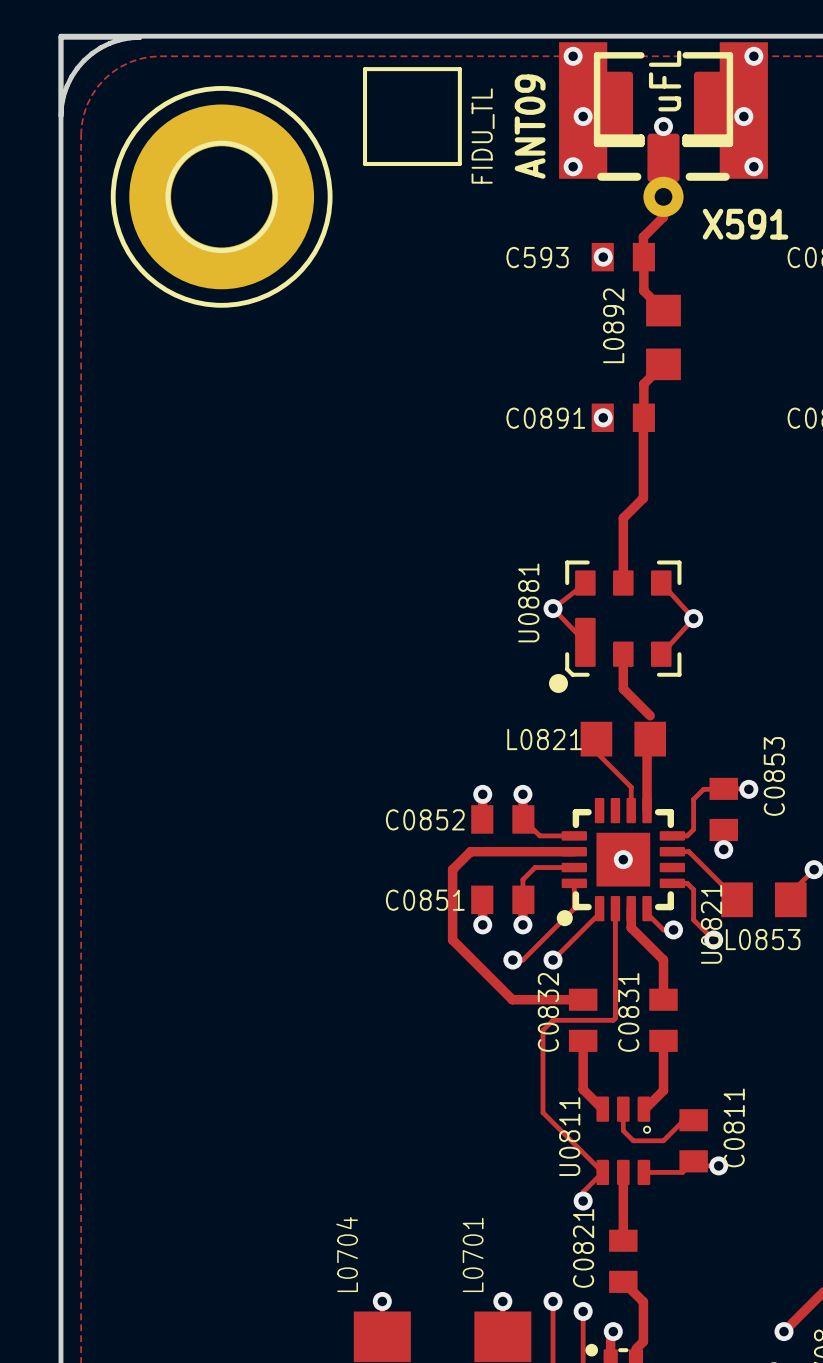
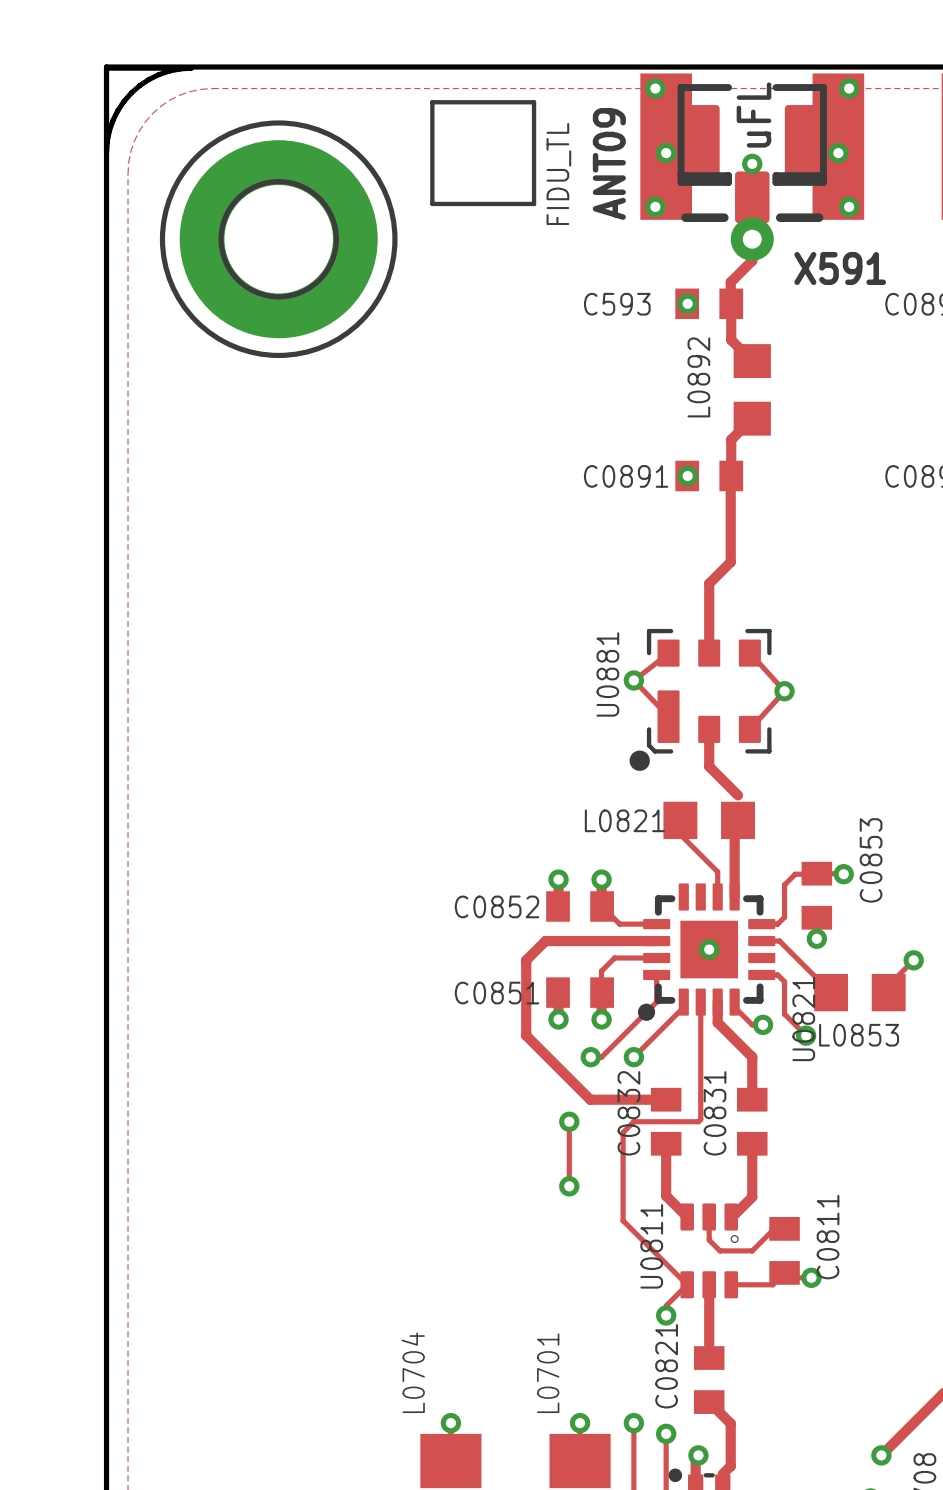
track: none -> (569, 1121) (569, 1186)
via: none -> (569, 1121)
via: none -> (569, 1186)

